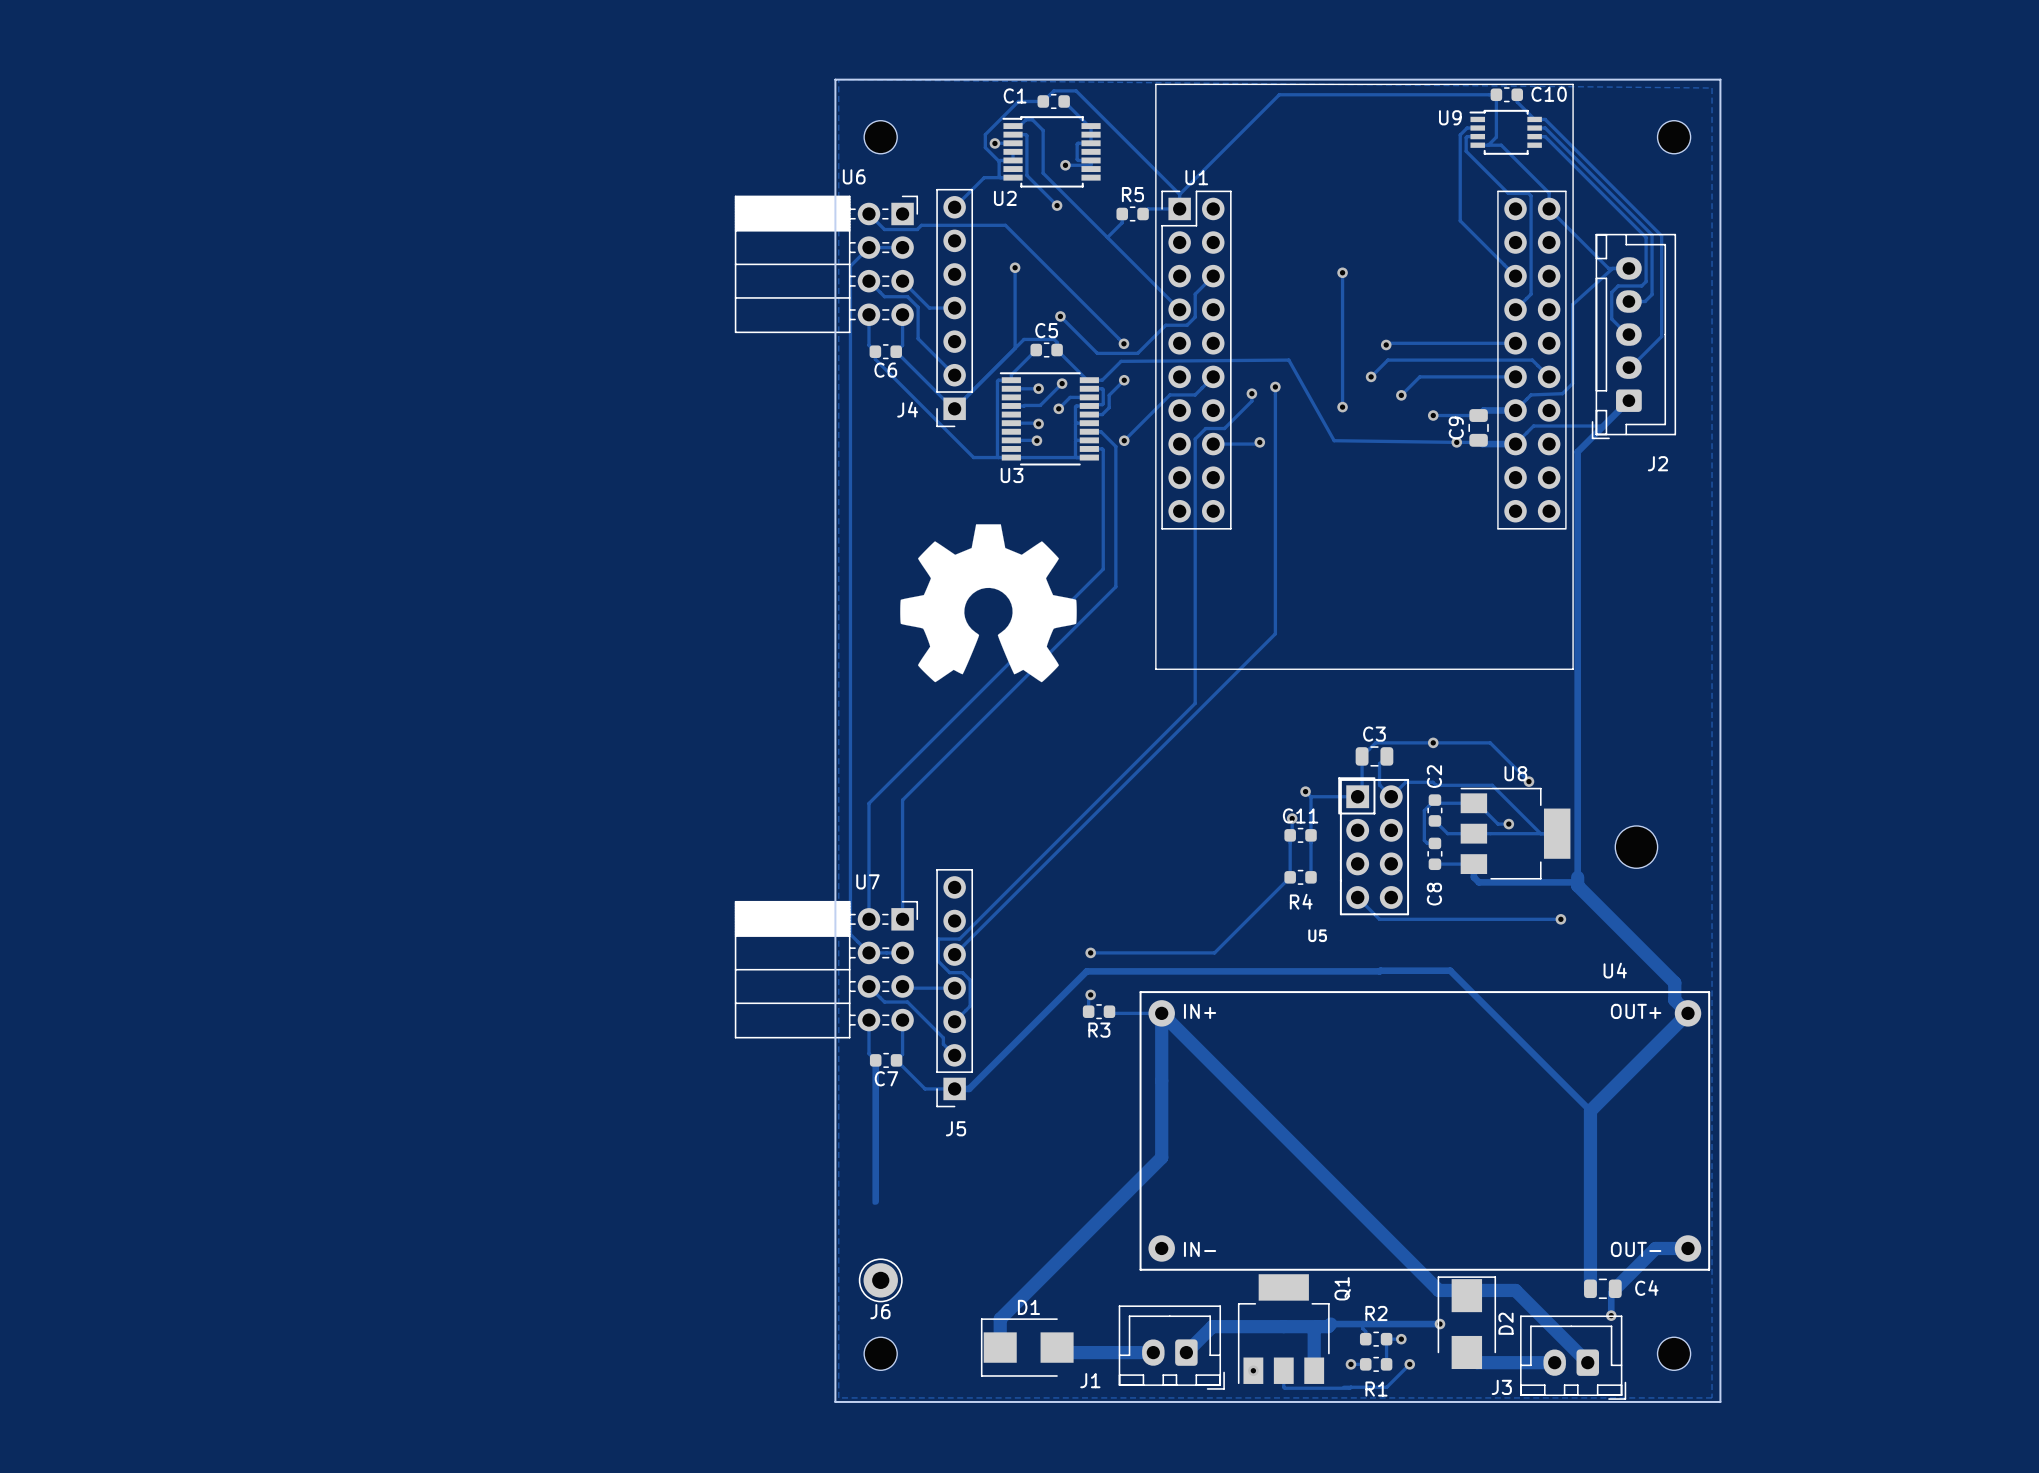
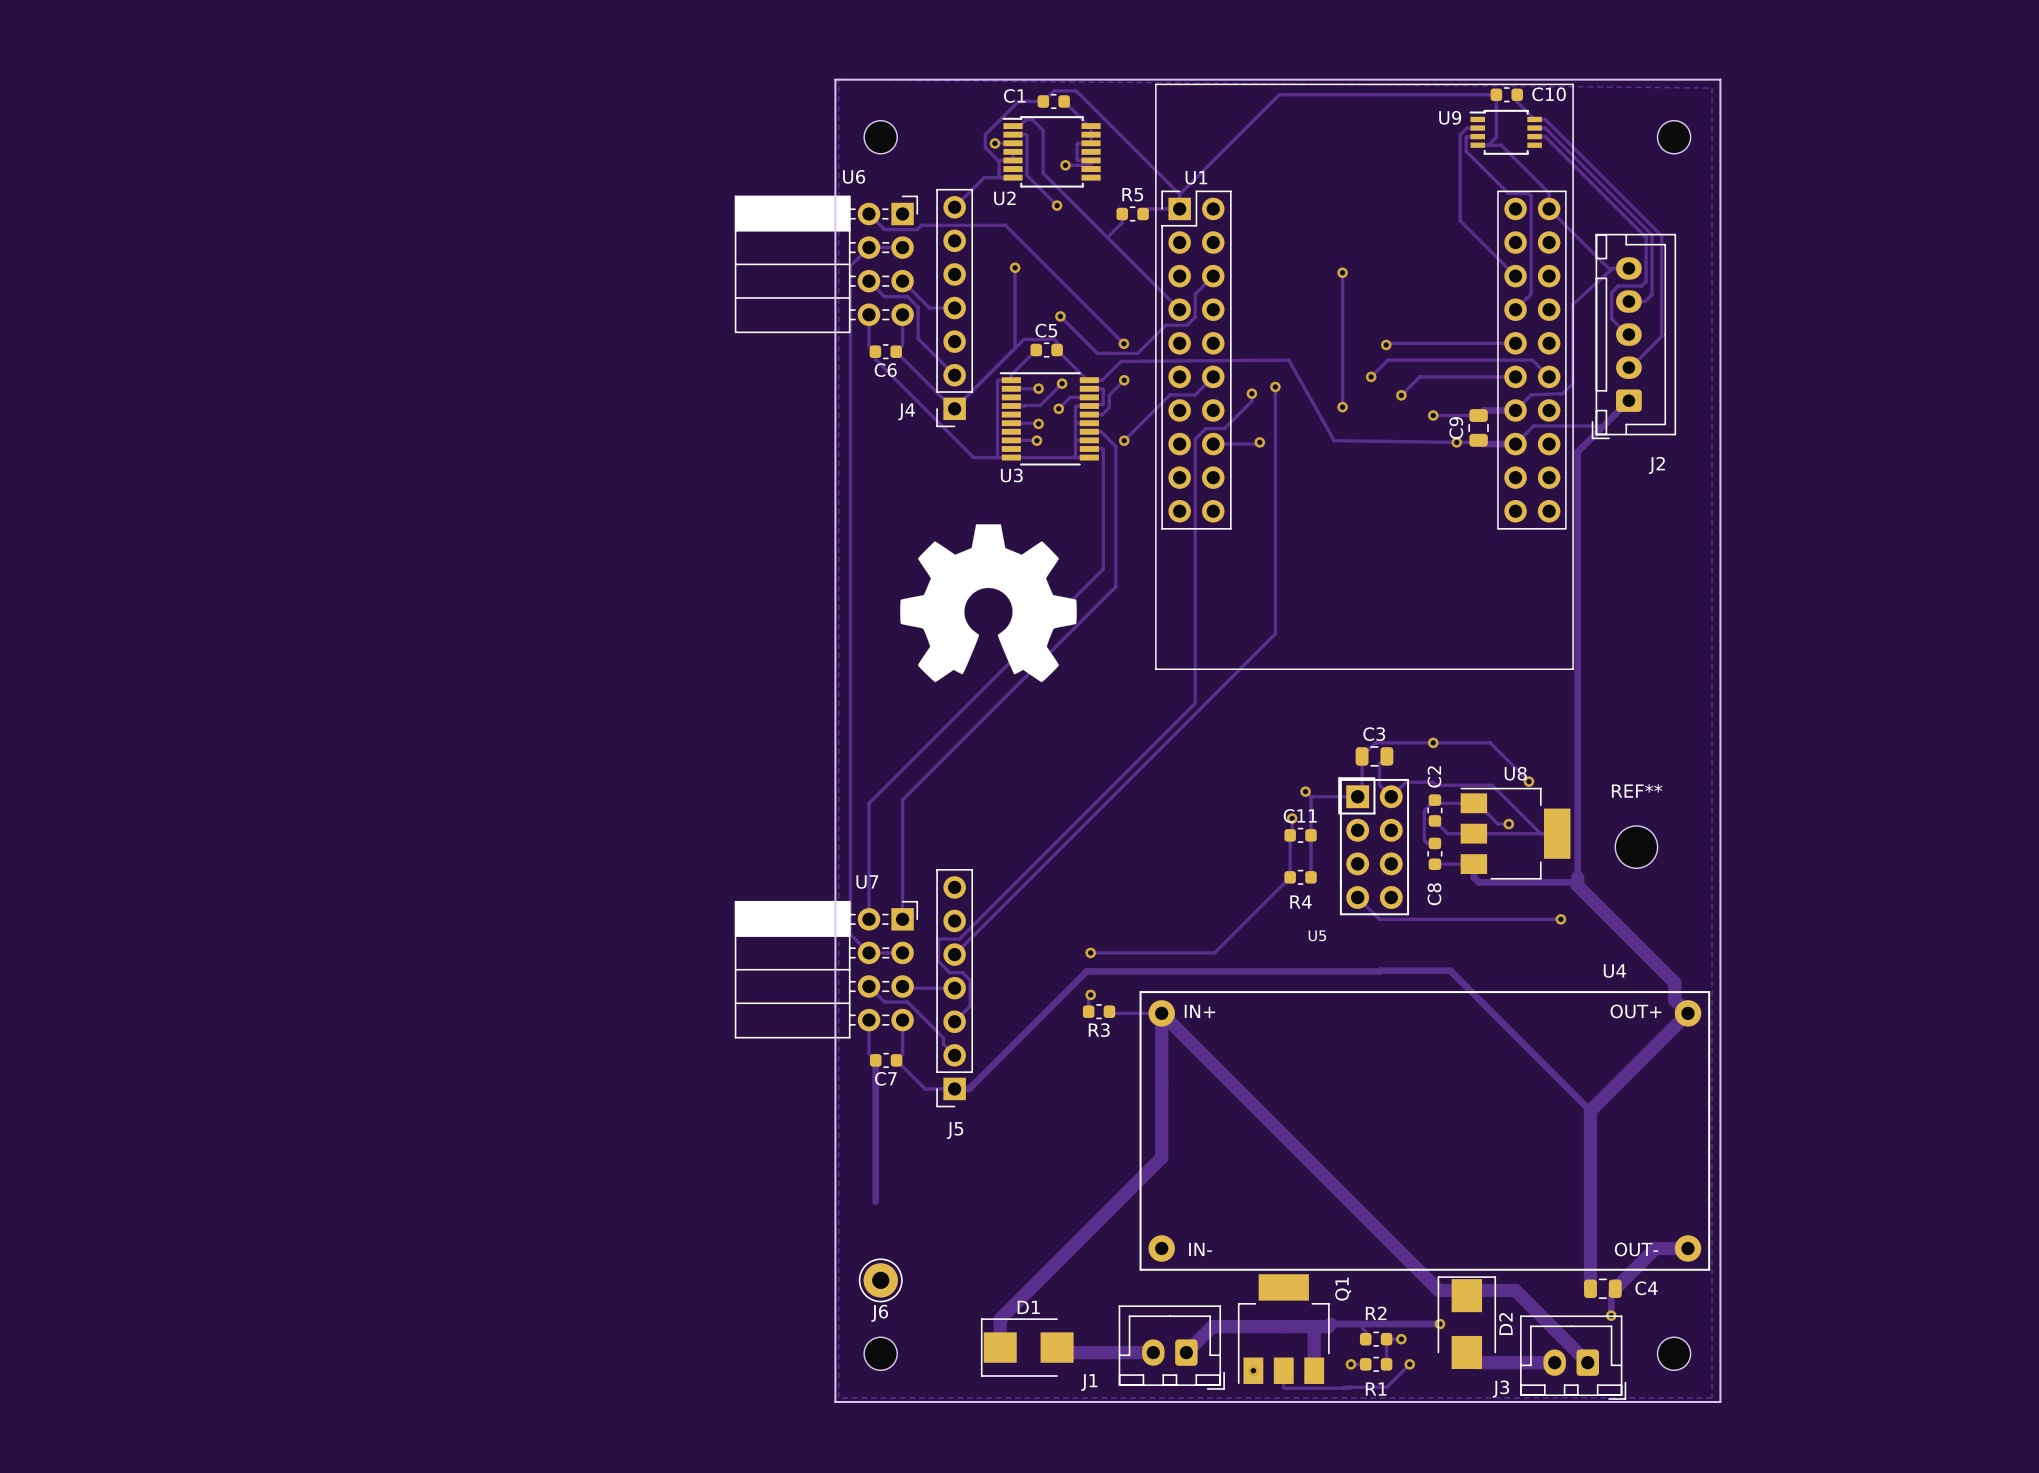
REF** name: none -> REF** (1637, 790)

